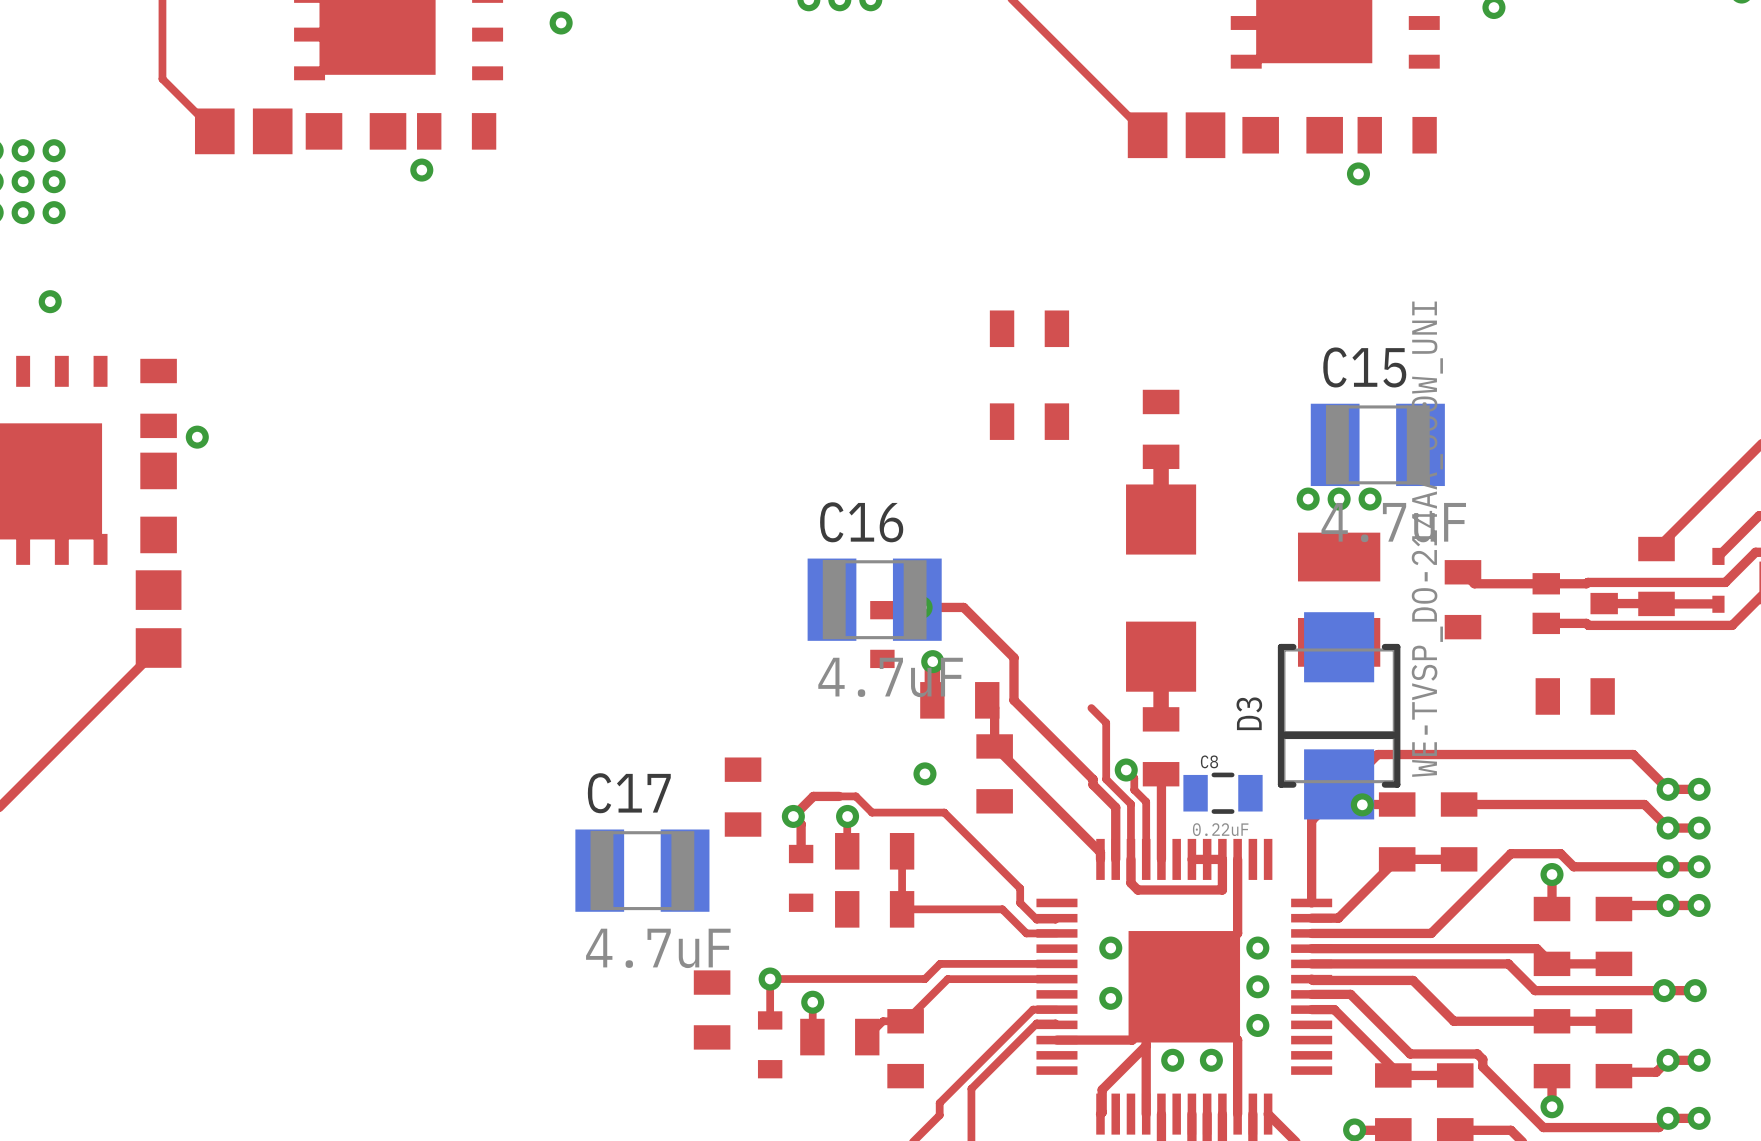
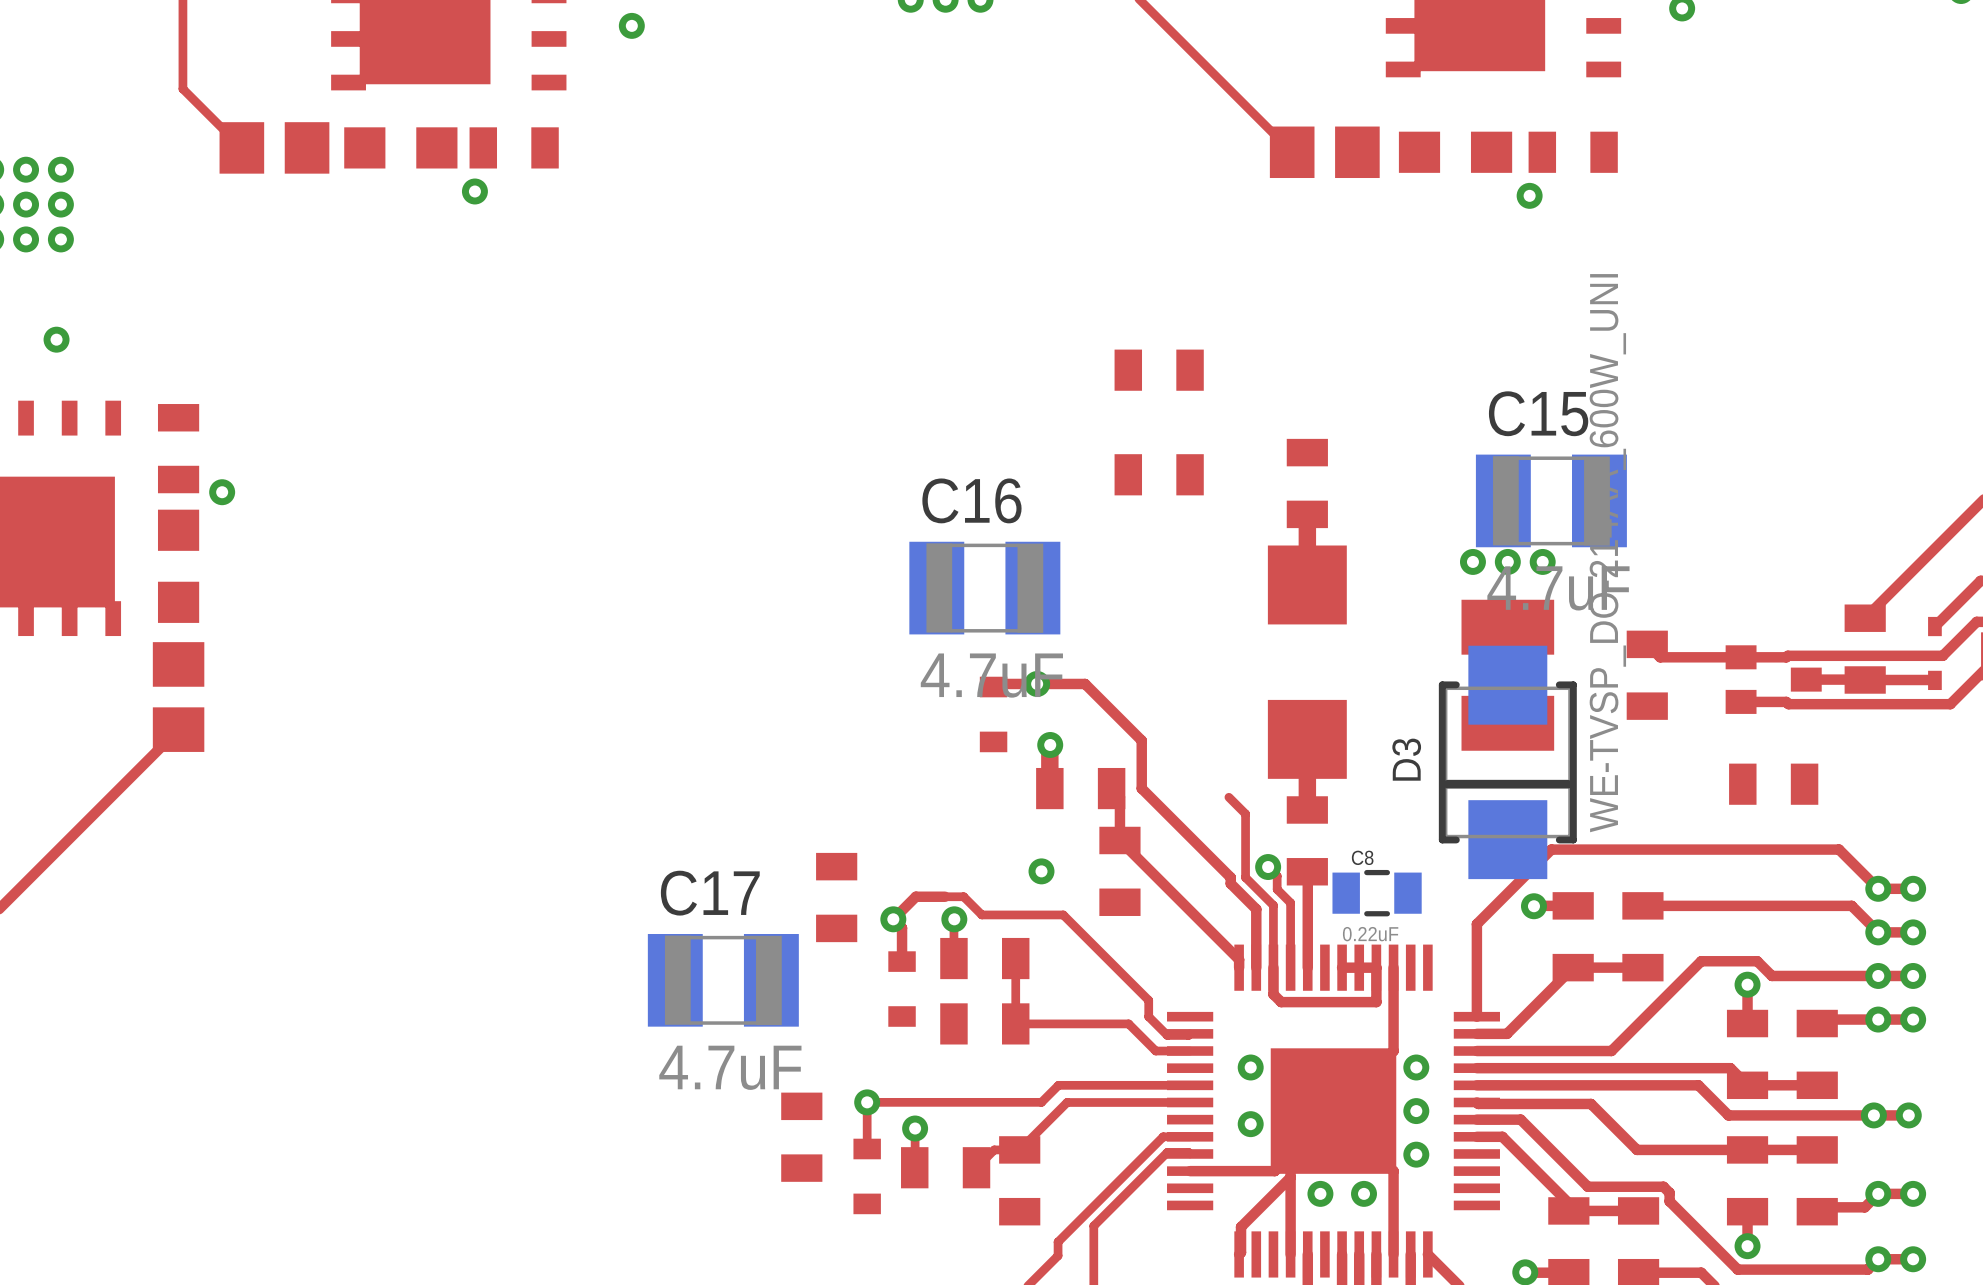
C16 position: (874, 599) -> (984, 588)
D3 position: (1339, 715) -> (1507, 762)

